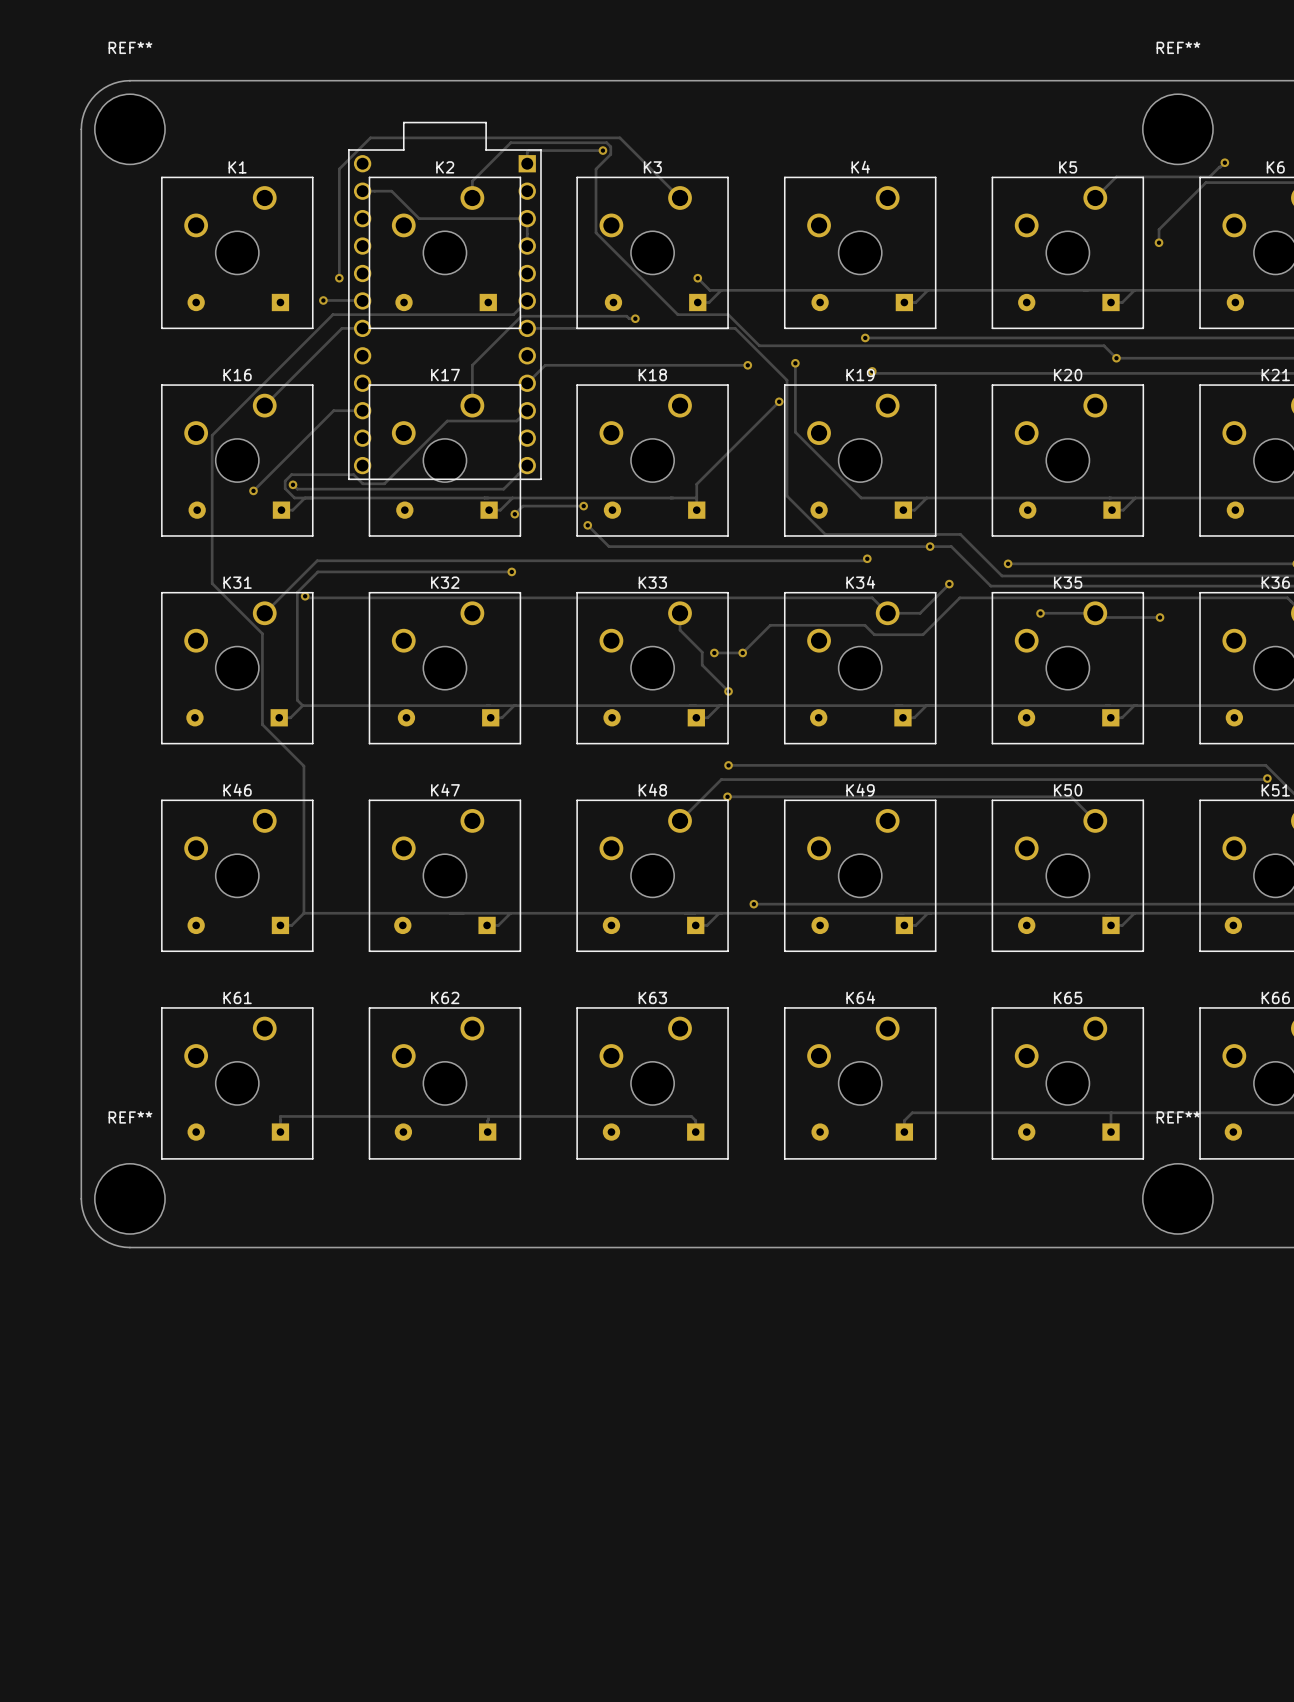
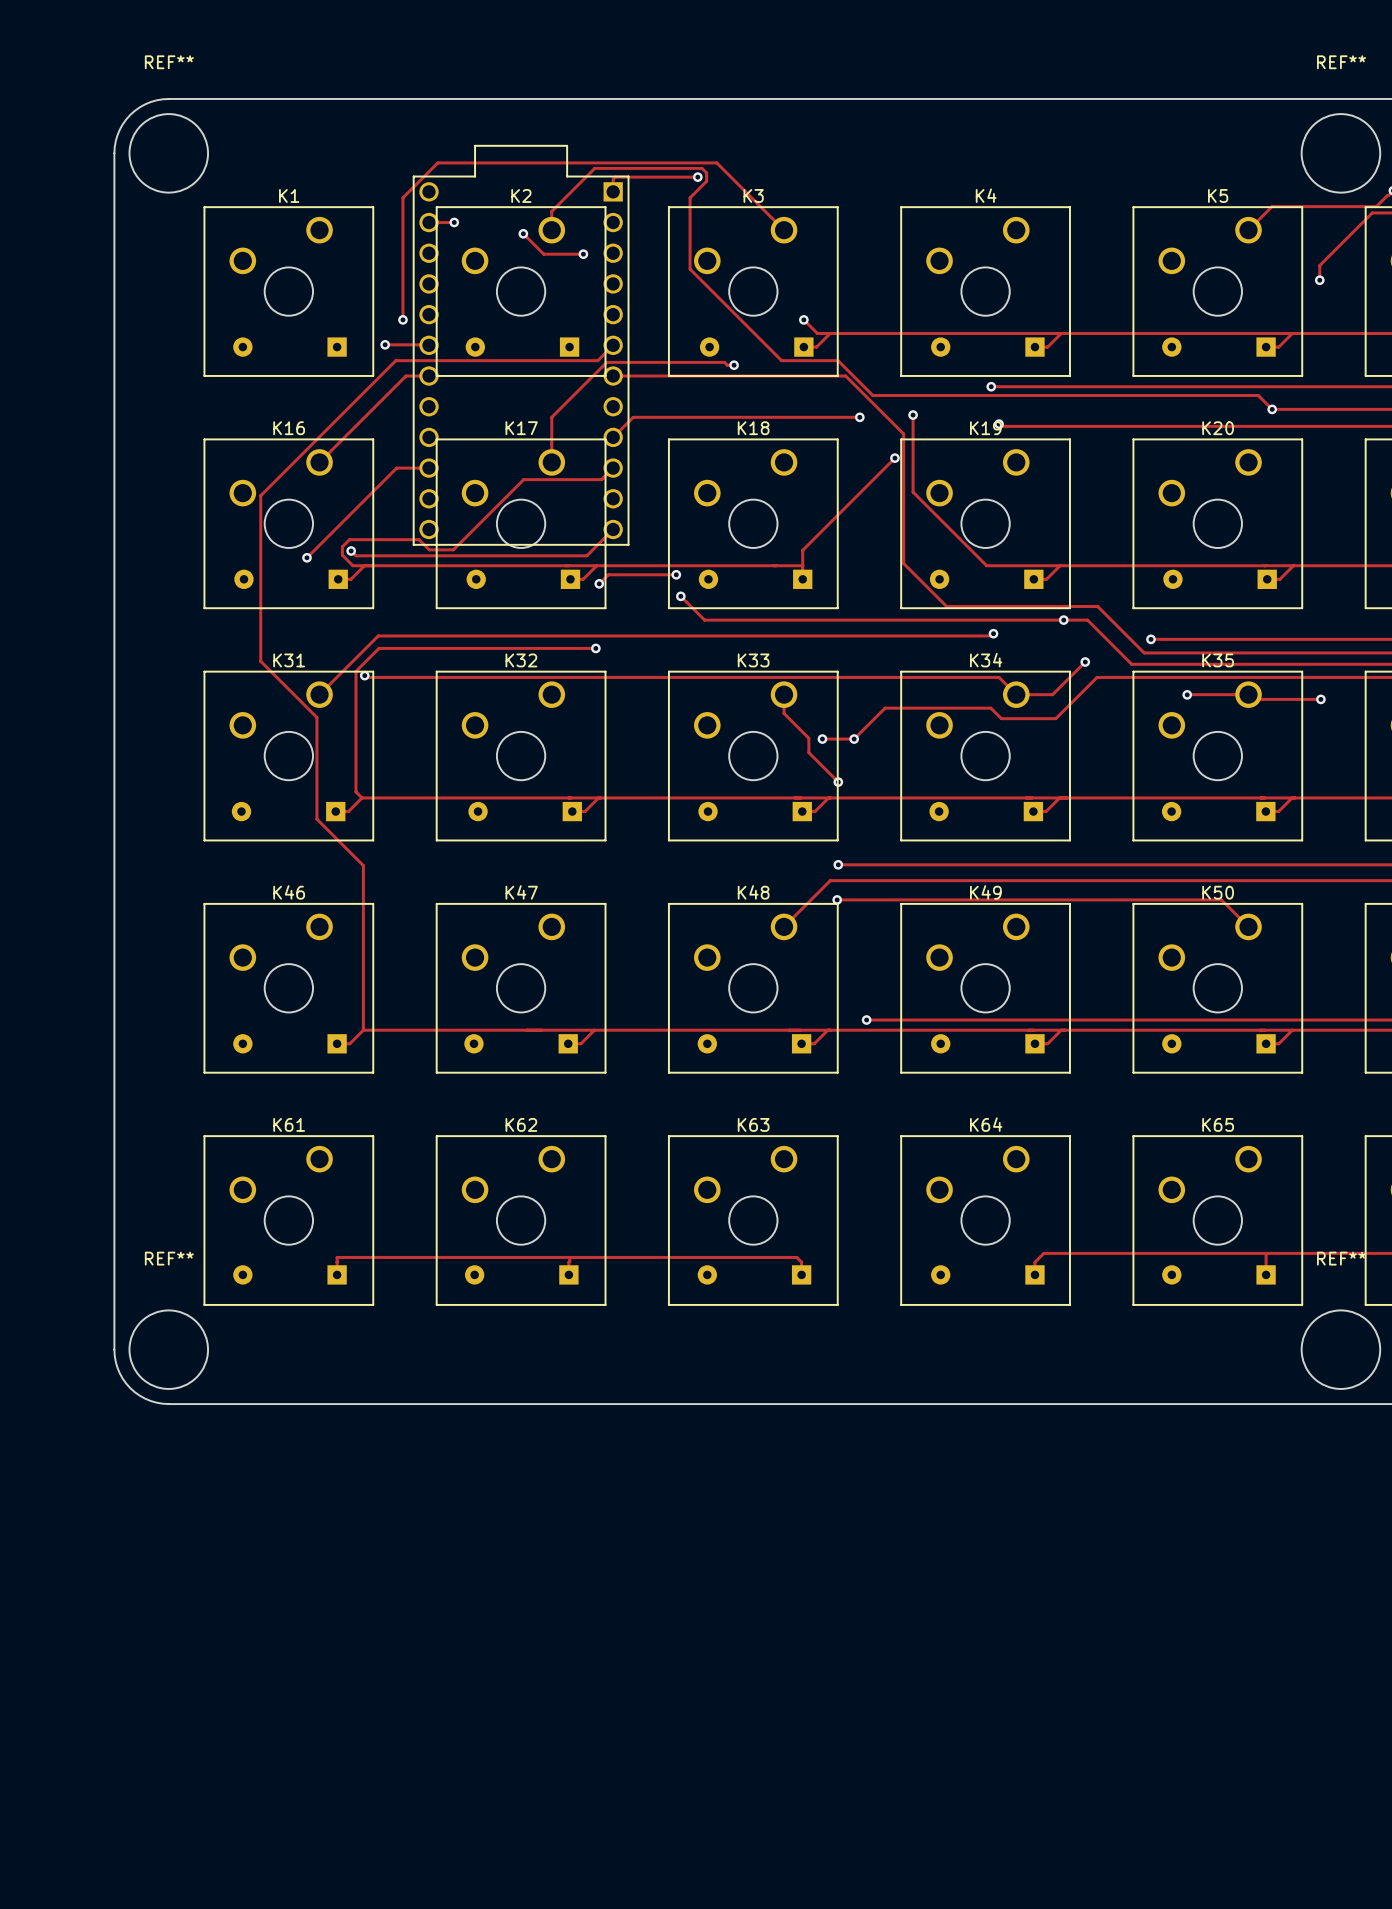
track: (385, 191) (391, 191) (419, 218) (527, 218) (527, 246) -> none
via: none -> (454, 222)
track: none -> (523, 233) (543, 254) (583, 254)
via: none -> (523, 233)
via: none -> (583, 254)

